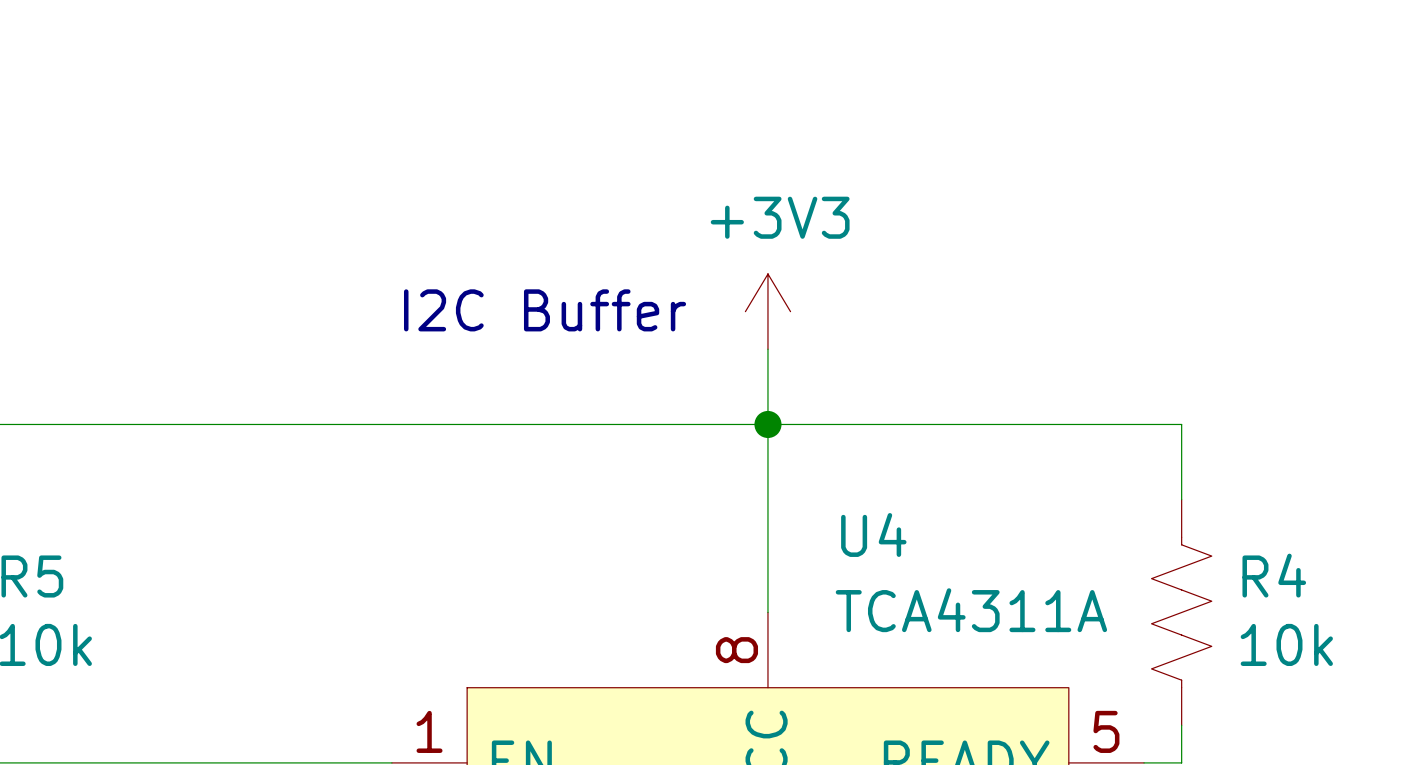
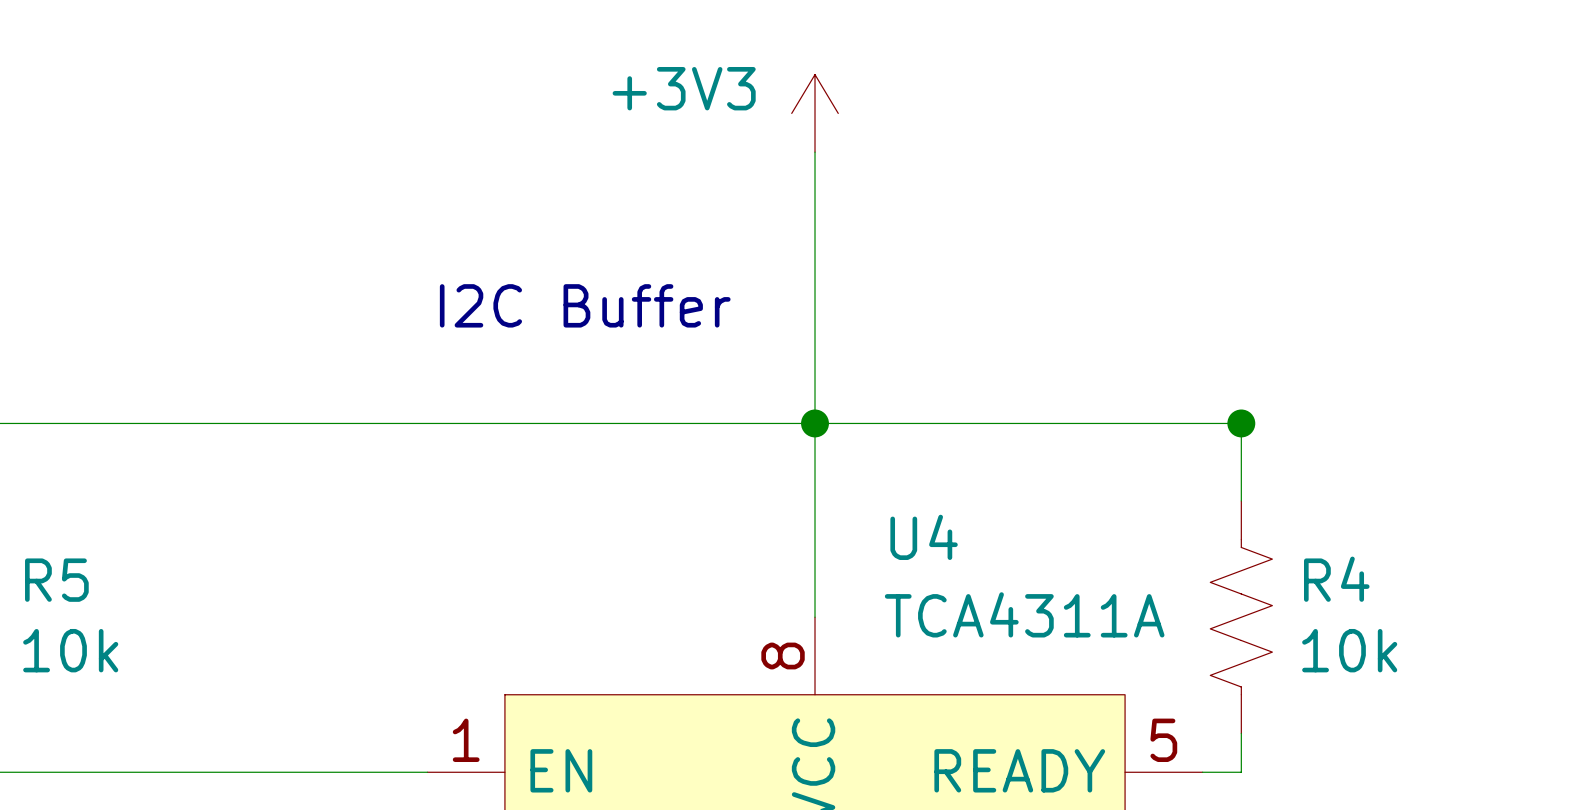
wire: none -> (815, 152) (815, 345)
power symbol text position: +3V3 (780, 217) -> +3V3 (684, 88)
power symbol position: +3V3 (767, 311) -> +3V3 (815, 113)
junction: none -> (1241, 423)

